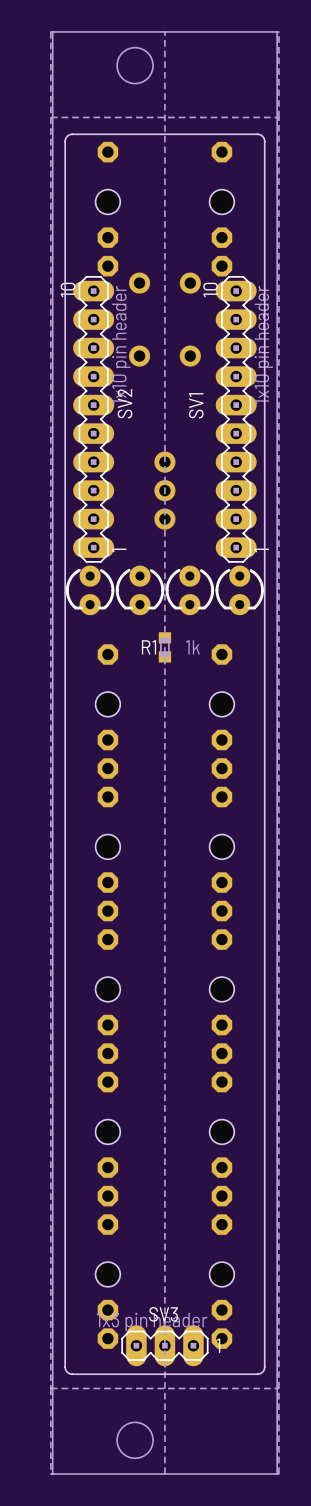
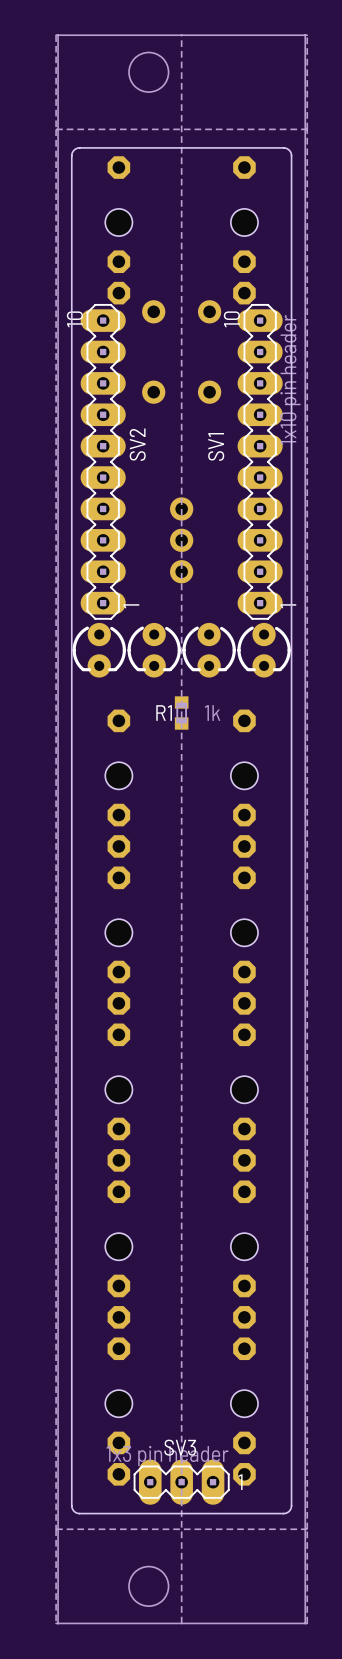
SV2 value: 1x10 pin header (121, 345) -> none

